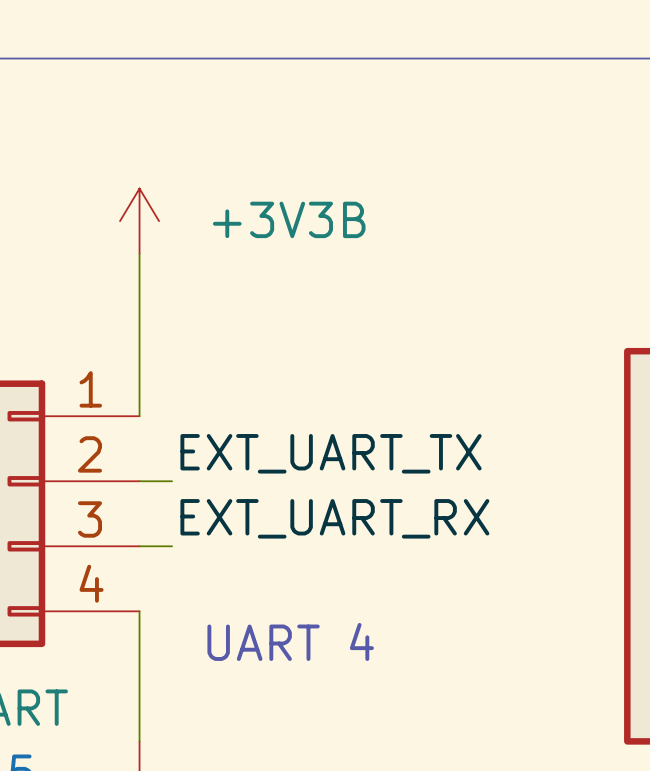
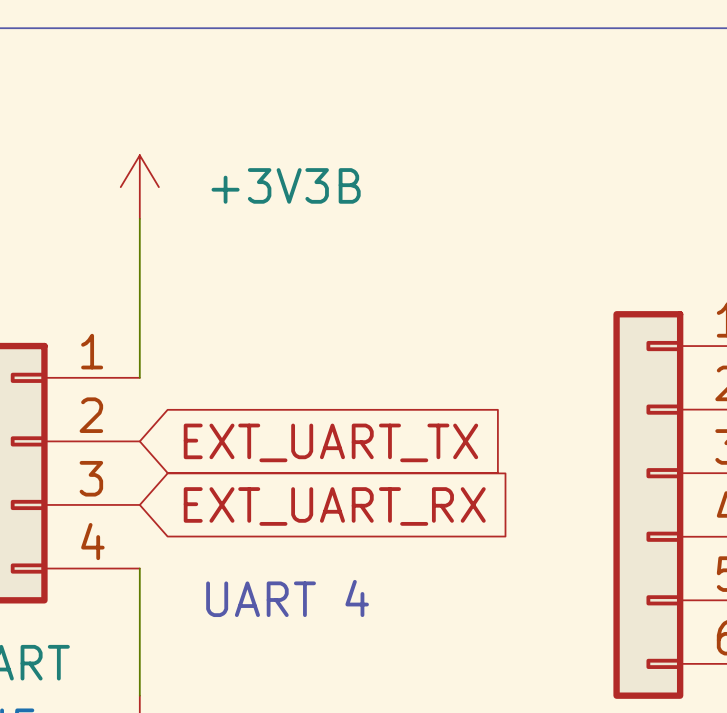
label: EXT_UART_TX (331, 453) -> none
wire: (139, 481) (172, 481) -> none
global label: none -> EXT_UART_TX (330, 442)
label: EXT_UART_RX (334, 518) -> none
wire: (139, 546) (172, 546) -> none
global label: none -> EXT_UART_RX (334, 506)

